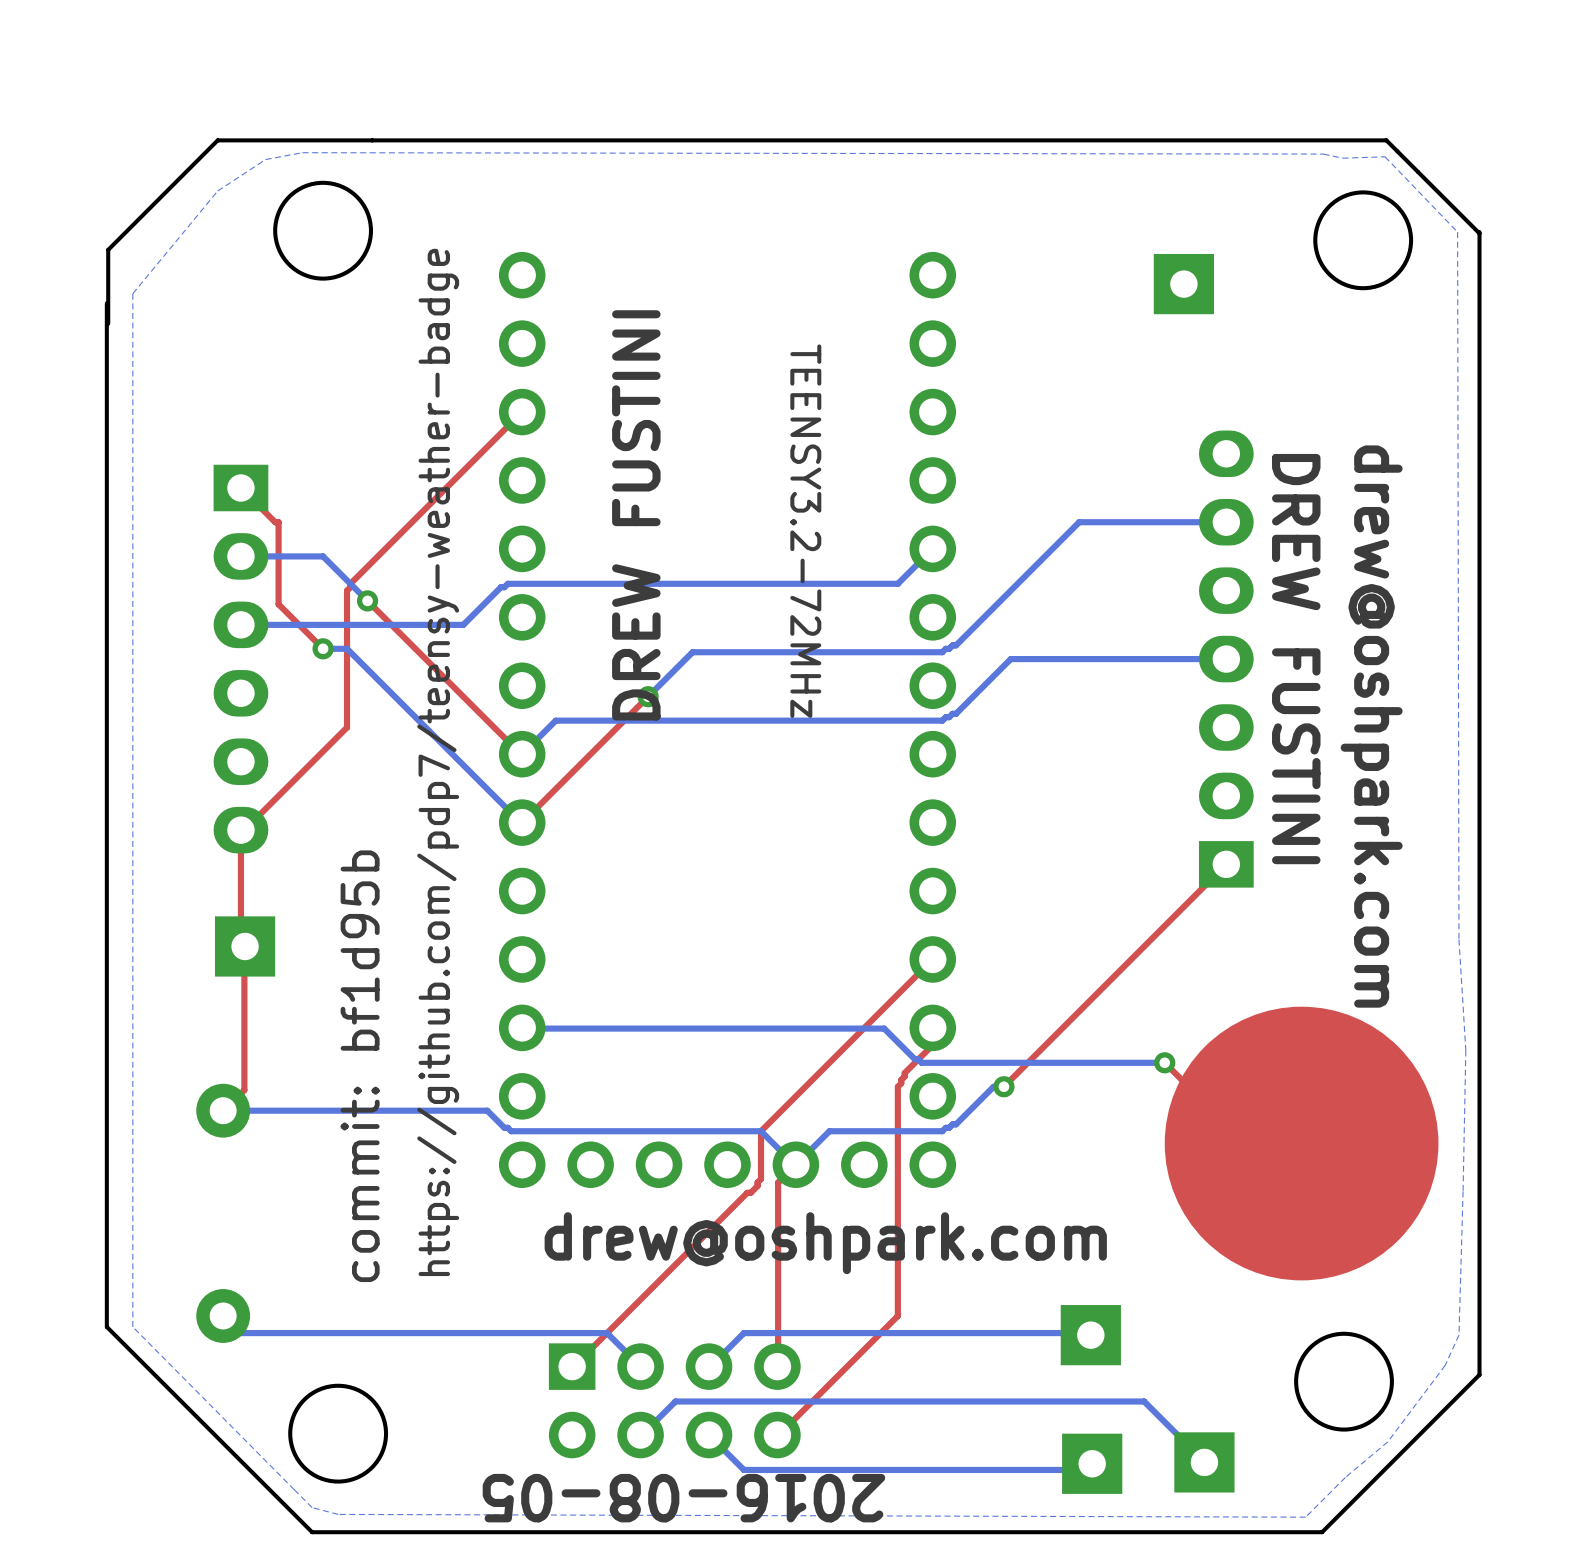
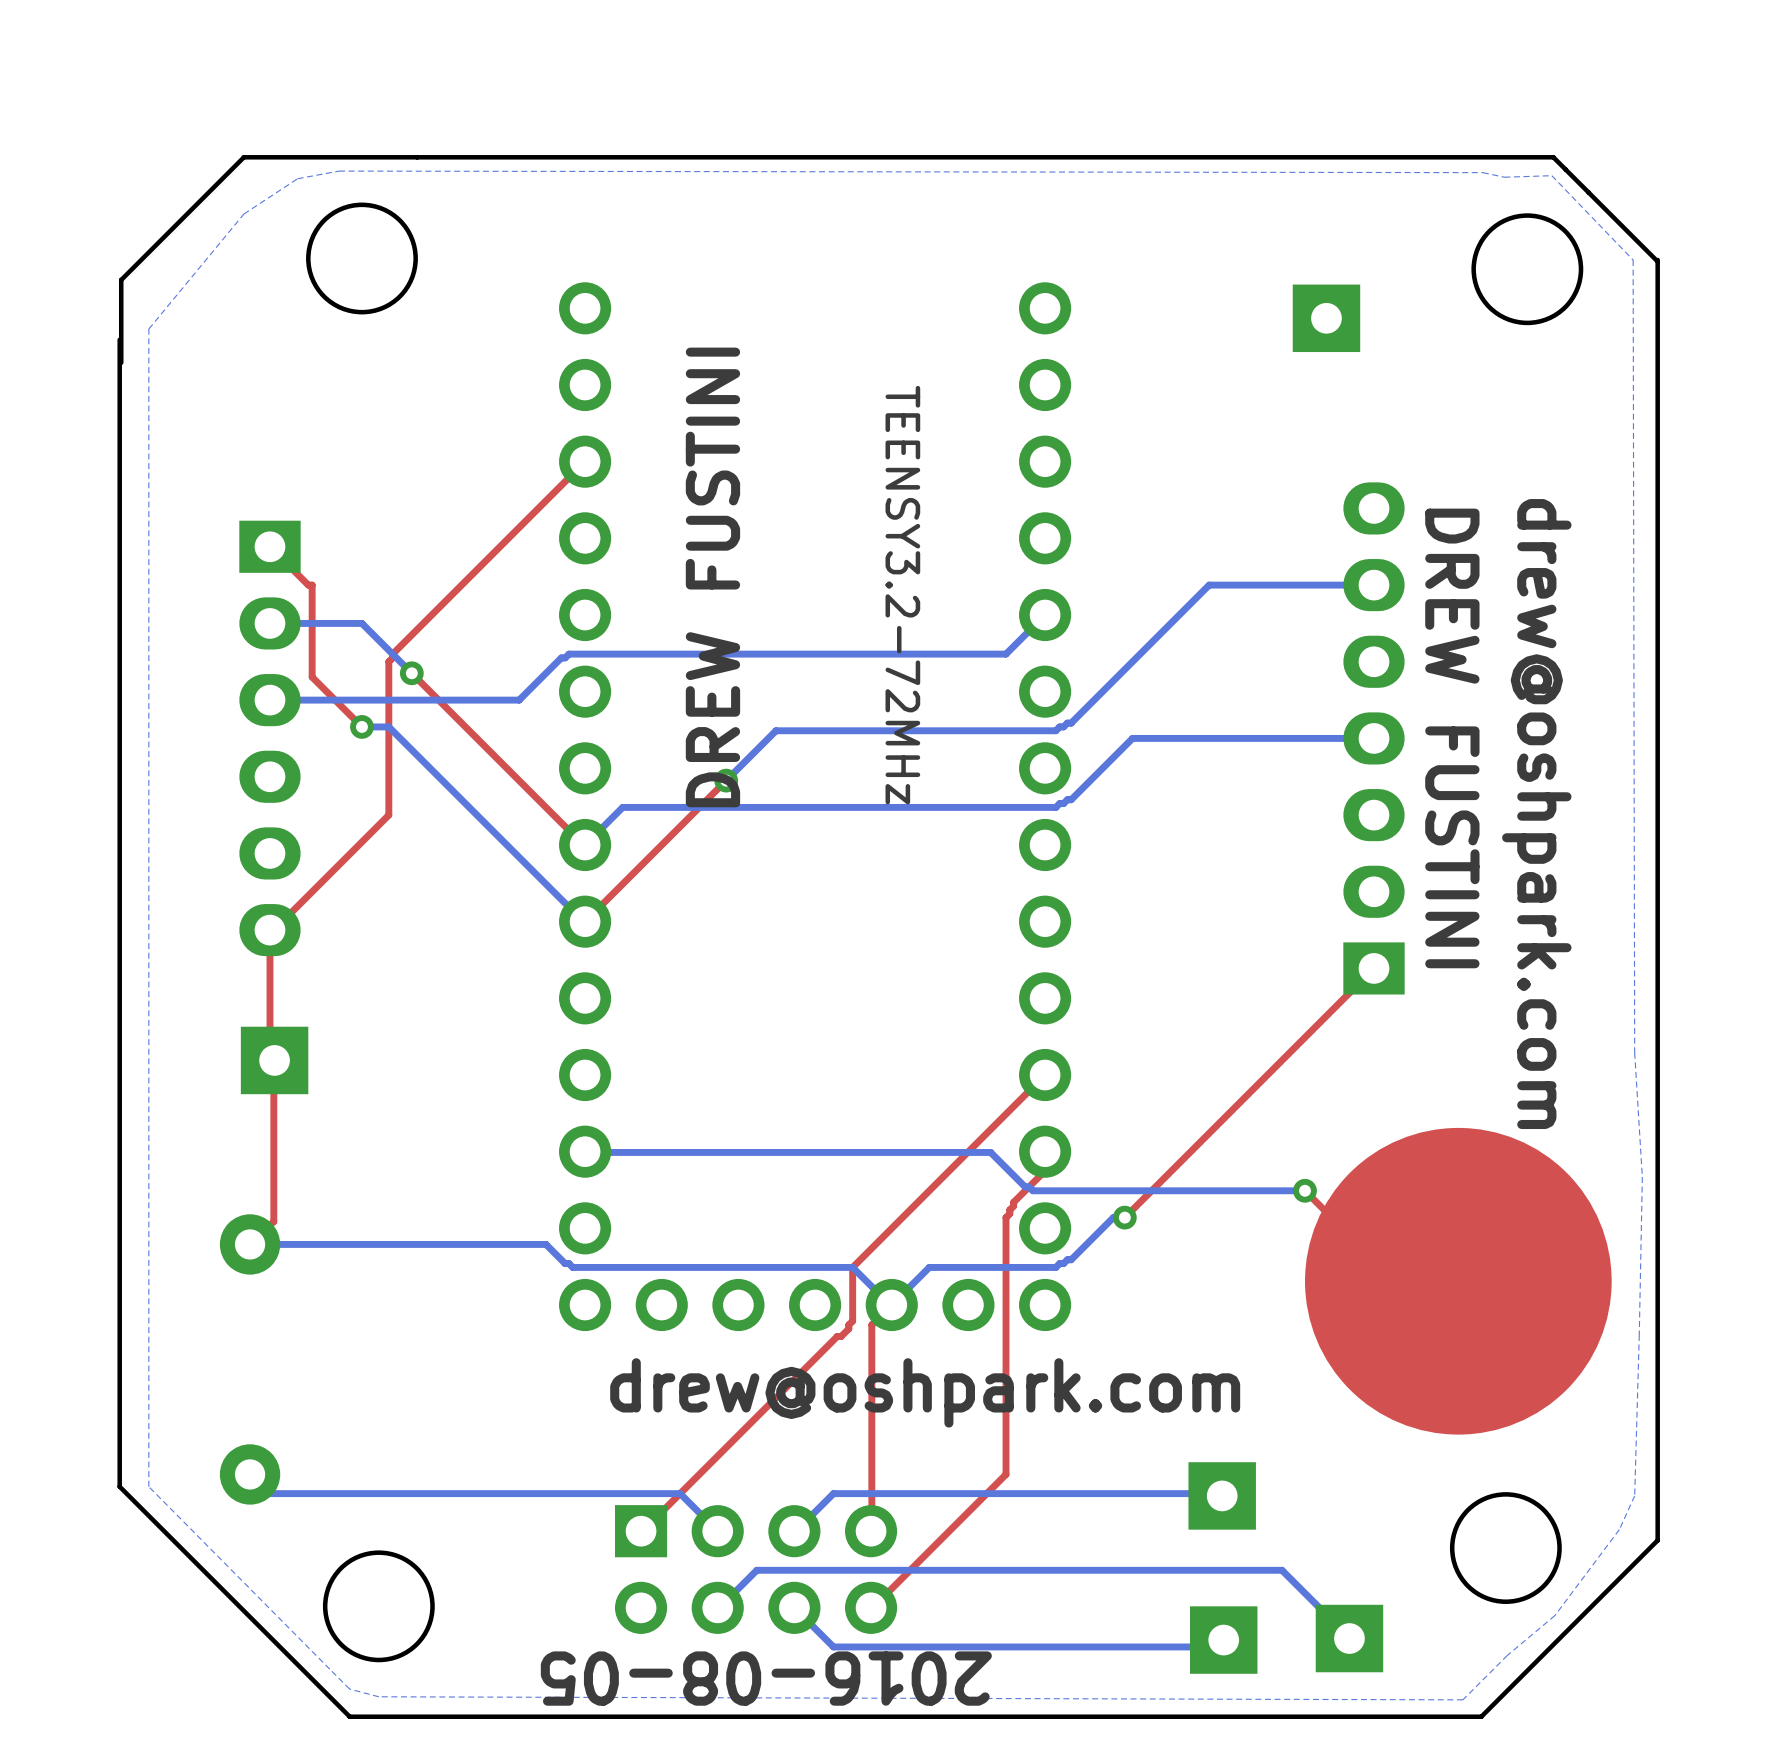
text: https://github.com/pdp7/teensy-weather-badge (438, 762) -> none
text: commit: bf1d95b (360, 1066) -> none

